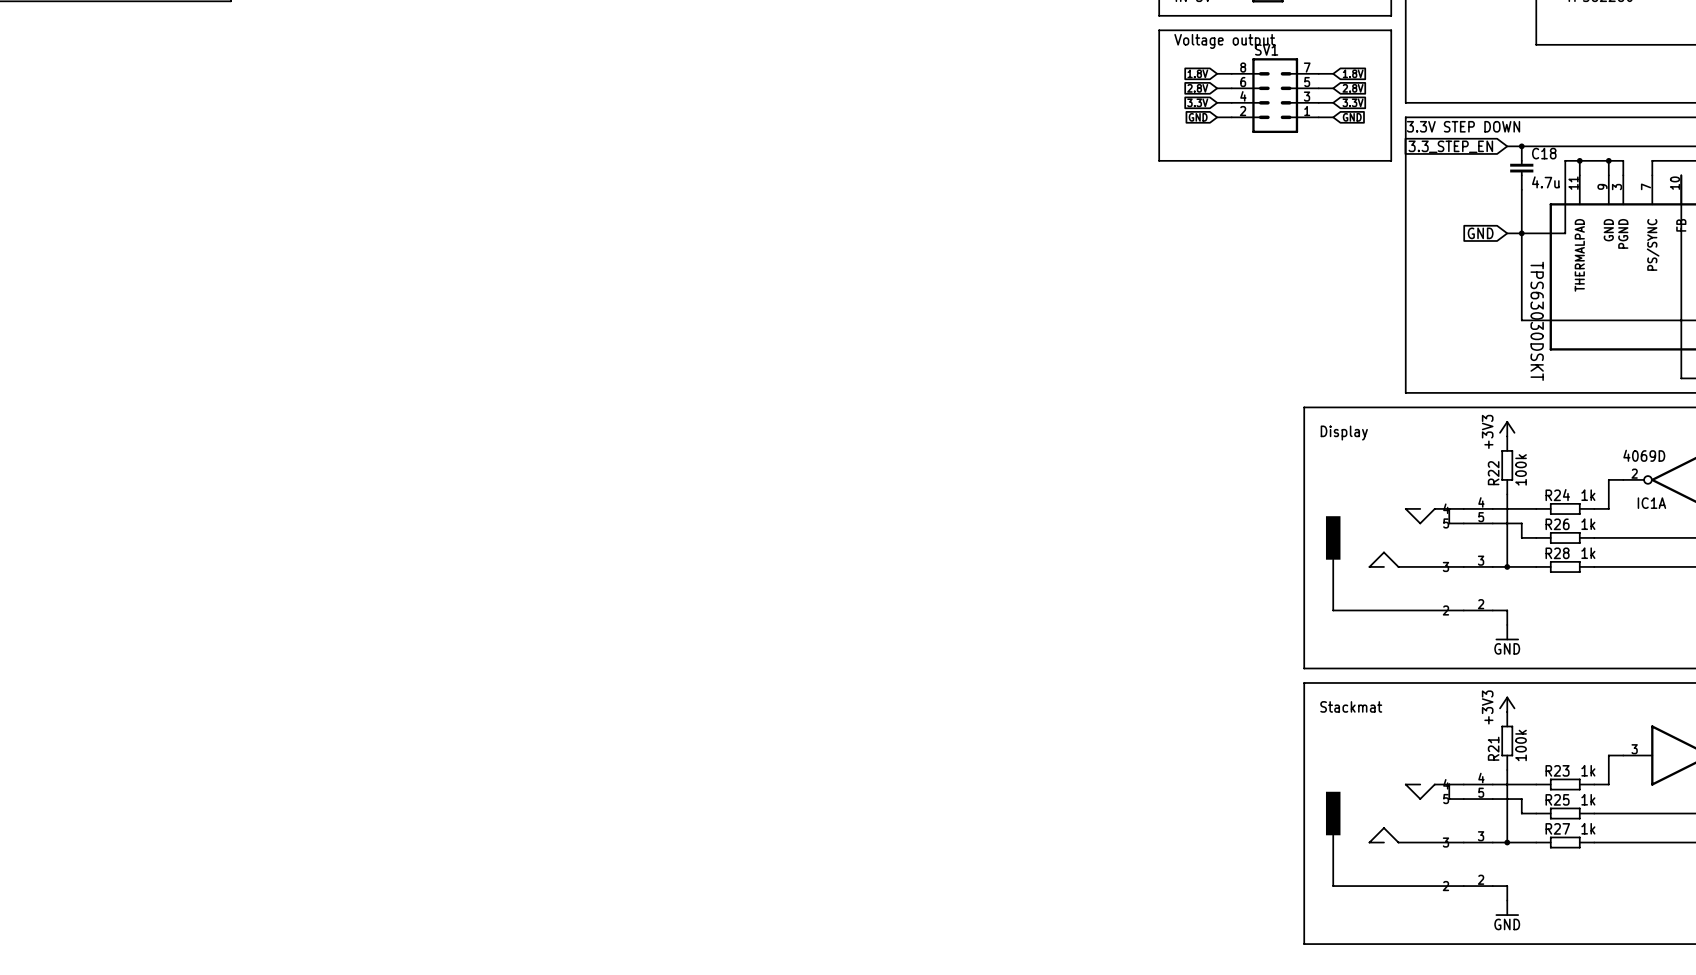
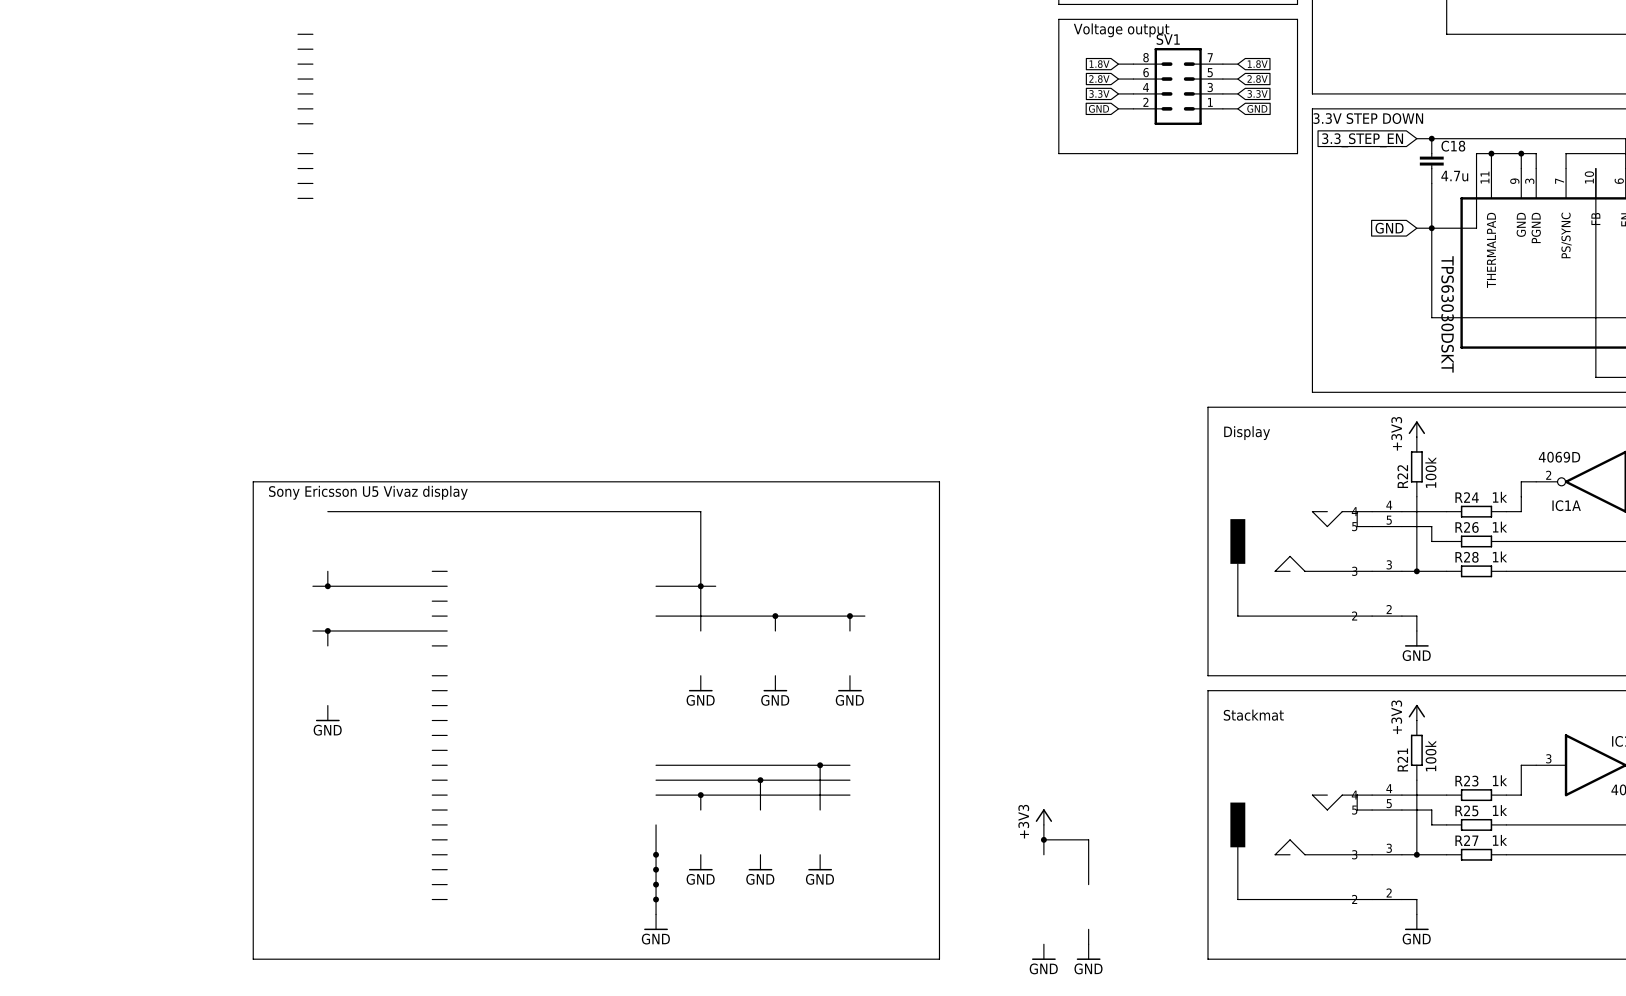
wire: none -> (297, 34) (312, 34)
wire: none -> (297, 49) (312, 49)
wire: none -> (297, 64) (312, 64)
wire: none -> (297, 79) (312, 79)
wire: none -> (297, 93) (312, 93)
wire: none -> (297, 108) (312, 108)
wire: none -> (297, 123) (312, 123)
wire: none -> (297, 153) (312, 153)
wire: none -> (297, 168) (312, 168)
wire: none -> (297, 183) (312, 183)
wire: none -> (297, 198) (312, 198)
line: none -> (253, 481) (939, 481) (939, 959) (253, 959) (253, 481)
text: none -> Sony Ericsson U5 Vivaz display (368, 492)
wire: none -> (327, 511) (700, 511) (700, 631)
wire: none -> (327, 571) (327, 586)
wire: none -> (432, 571) (447, 571)
wire: none -> (312, 586) (447, 586)
junction: none -> (327, 586)
wire: none -> (656, 586) (715, 586)
junction: none -> (700, 586)
wire: none -> (432, 601) (447, 601)
wire: none -> (432, 616) (447, 616)
wire: none -> (656, 616) (864, 616)
wire: none -> (775, 616) (775, 631)
junction: none -> (775, 616)
wire: none -> (849, 616) (849, 631)
junction: none -> (849, 616)
wire: none -> (312, 631) (447, 631)
wire: none -> (327, 631) (327, 645)
junction: none -> (327, 631)
wire: none -> (432, 645) (447, 645)
wire: none -> (432, 675) (447, 675)
power symbol: none -> GND (700, 683)
power symbol: none -> GND (775, 683)
power symbol: none -> GND (849, 683)
wire: none -> (432, 690) (447, 690)
wire: none -> (432, 705) (447, 705)
power symbol: none -> GND (327, 713)
wire: none -> (432, 720) (447, 720)
wire: none -> (432, 735) (447, 735)
wire: none -> (432, 750) (447, 750)
wire: none -> (432, 765) (447, 765)
wire: none -> (656, 765) (849, 765)
wire: none -> (820, 765) (820, 810)
junction: none -> (820, 765)
wire: none -> (432, 780) (447, 780)
wire: none -> (656, 780) (849, 780)
wire: none -> (760, 780) (760, 810)
junction: none -> (760, 780)
wire: none -> (432, 795) (447, 795)
wire: none -> (656, 795) (849, 795)
wire: none -> (700, 795) (700, 810)
junction: none -> (700, 795)
wire: none -> (432, 810) (447, 810)
power symbol: none -> +3V3 (1043, 817)
wire: none -> (432, 824) (447, 824)
wire: none -> (656, 824) (656, 914)
wire: none -> (1043, 824) (1043, 854)
wire: none -> (432, 839) (447, 839)
wire: none -> (1043, 839) (1088, 839) (1088, 884)
junction: none -> (1043, 839)
wire: none -> (432, 854) (447, 854)
junction: none -> (656, 854)
power symbol: none -> GND (700, 862)
power symbol: none -> GND (760, 862)
power symbol: none -> GND (820, 862)
wire: none -> (432, 869) (447, 869)
junction: none -> (656, 869)
wire: none -> (432, 884) (447, 884)
junction: none -> (656, 884)
wire: none -> (432, 899) (447, 899)
junction: none -> (656, 899)
power symbol: none -> GND (656, 922)
wire: none -> (1088, 929) (1088, 944)
power symbol: none -> GND (1043, 952)
power symbol: none -> GND (1088, 952)

